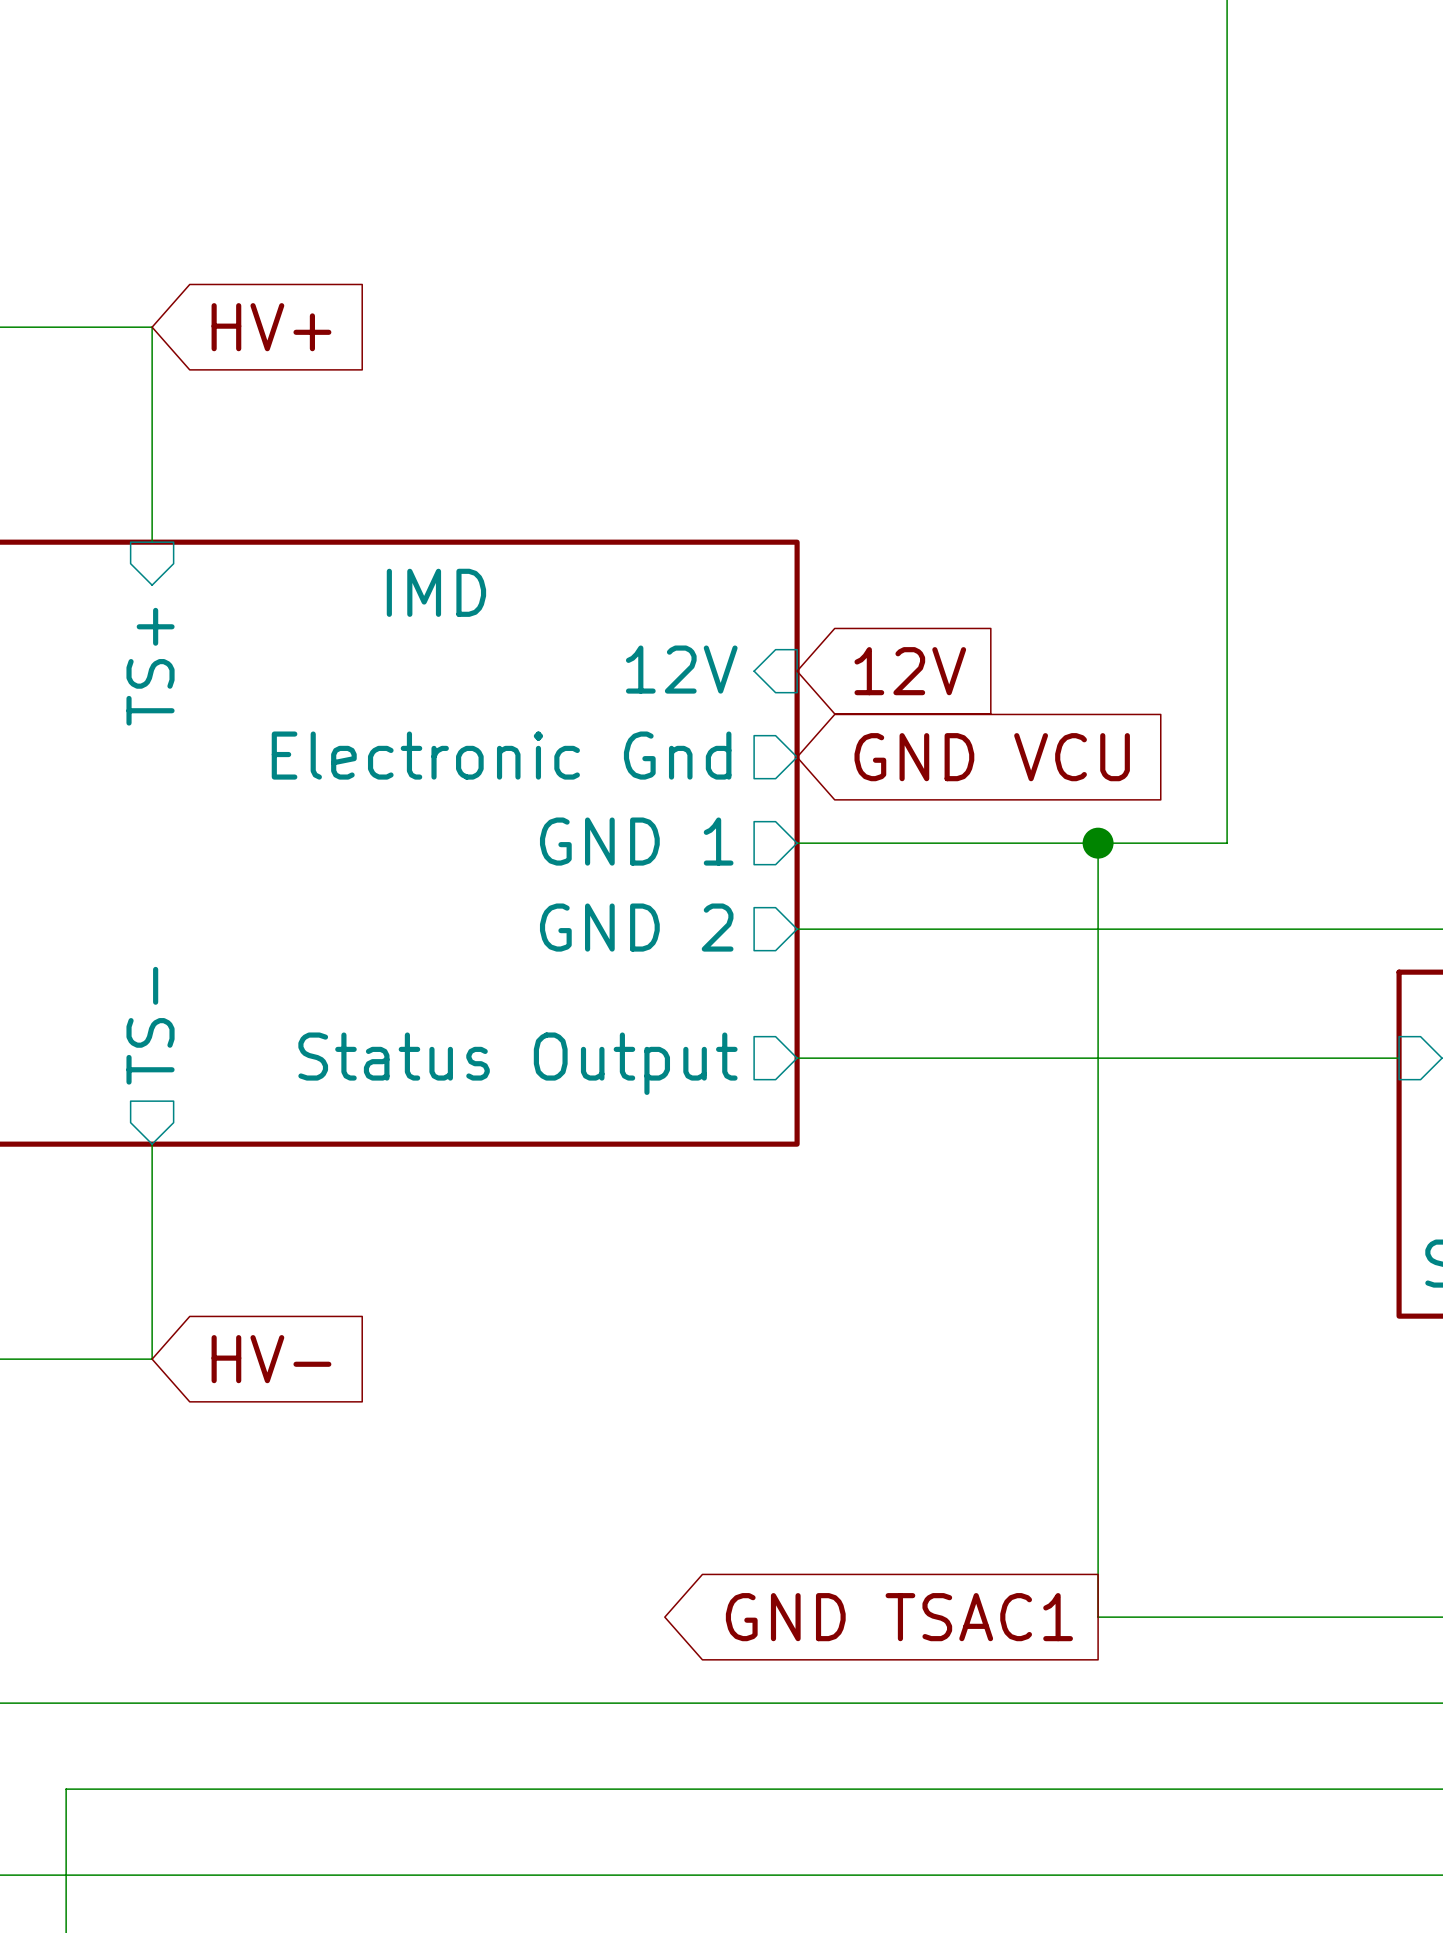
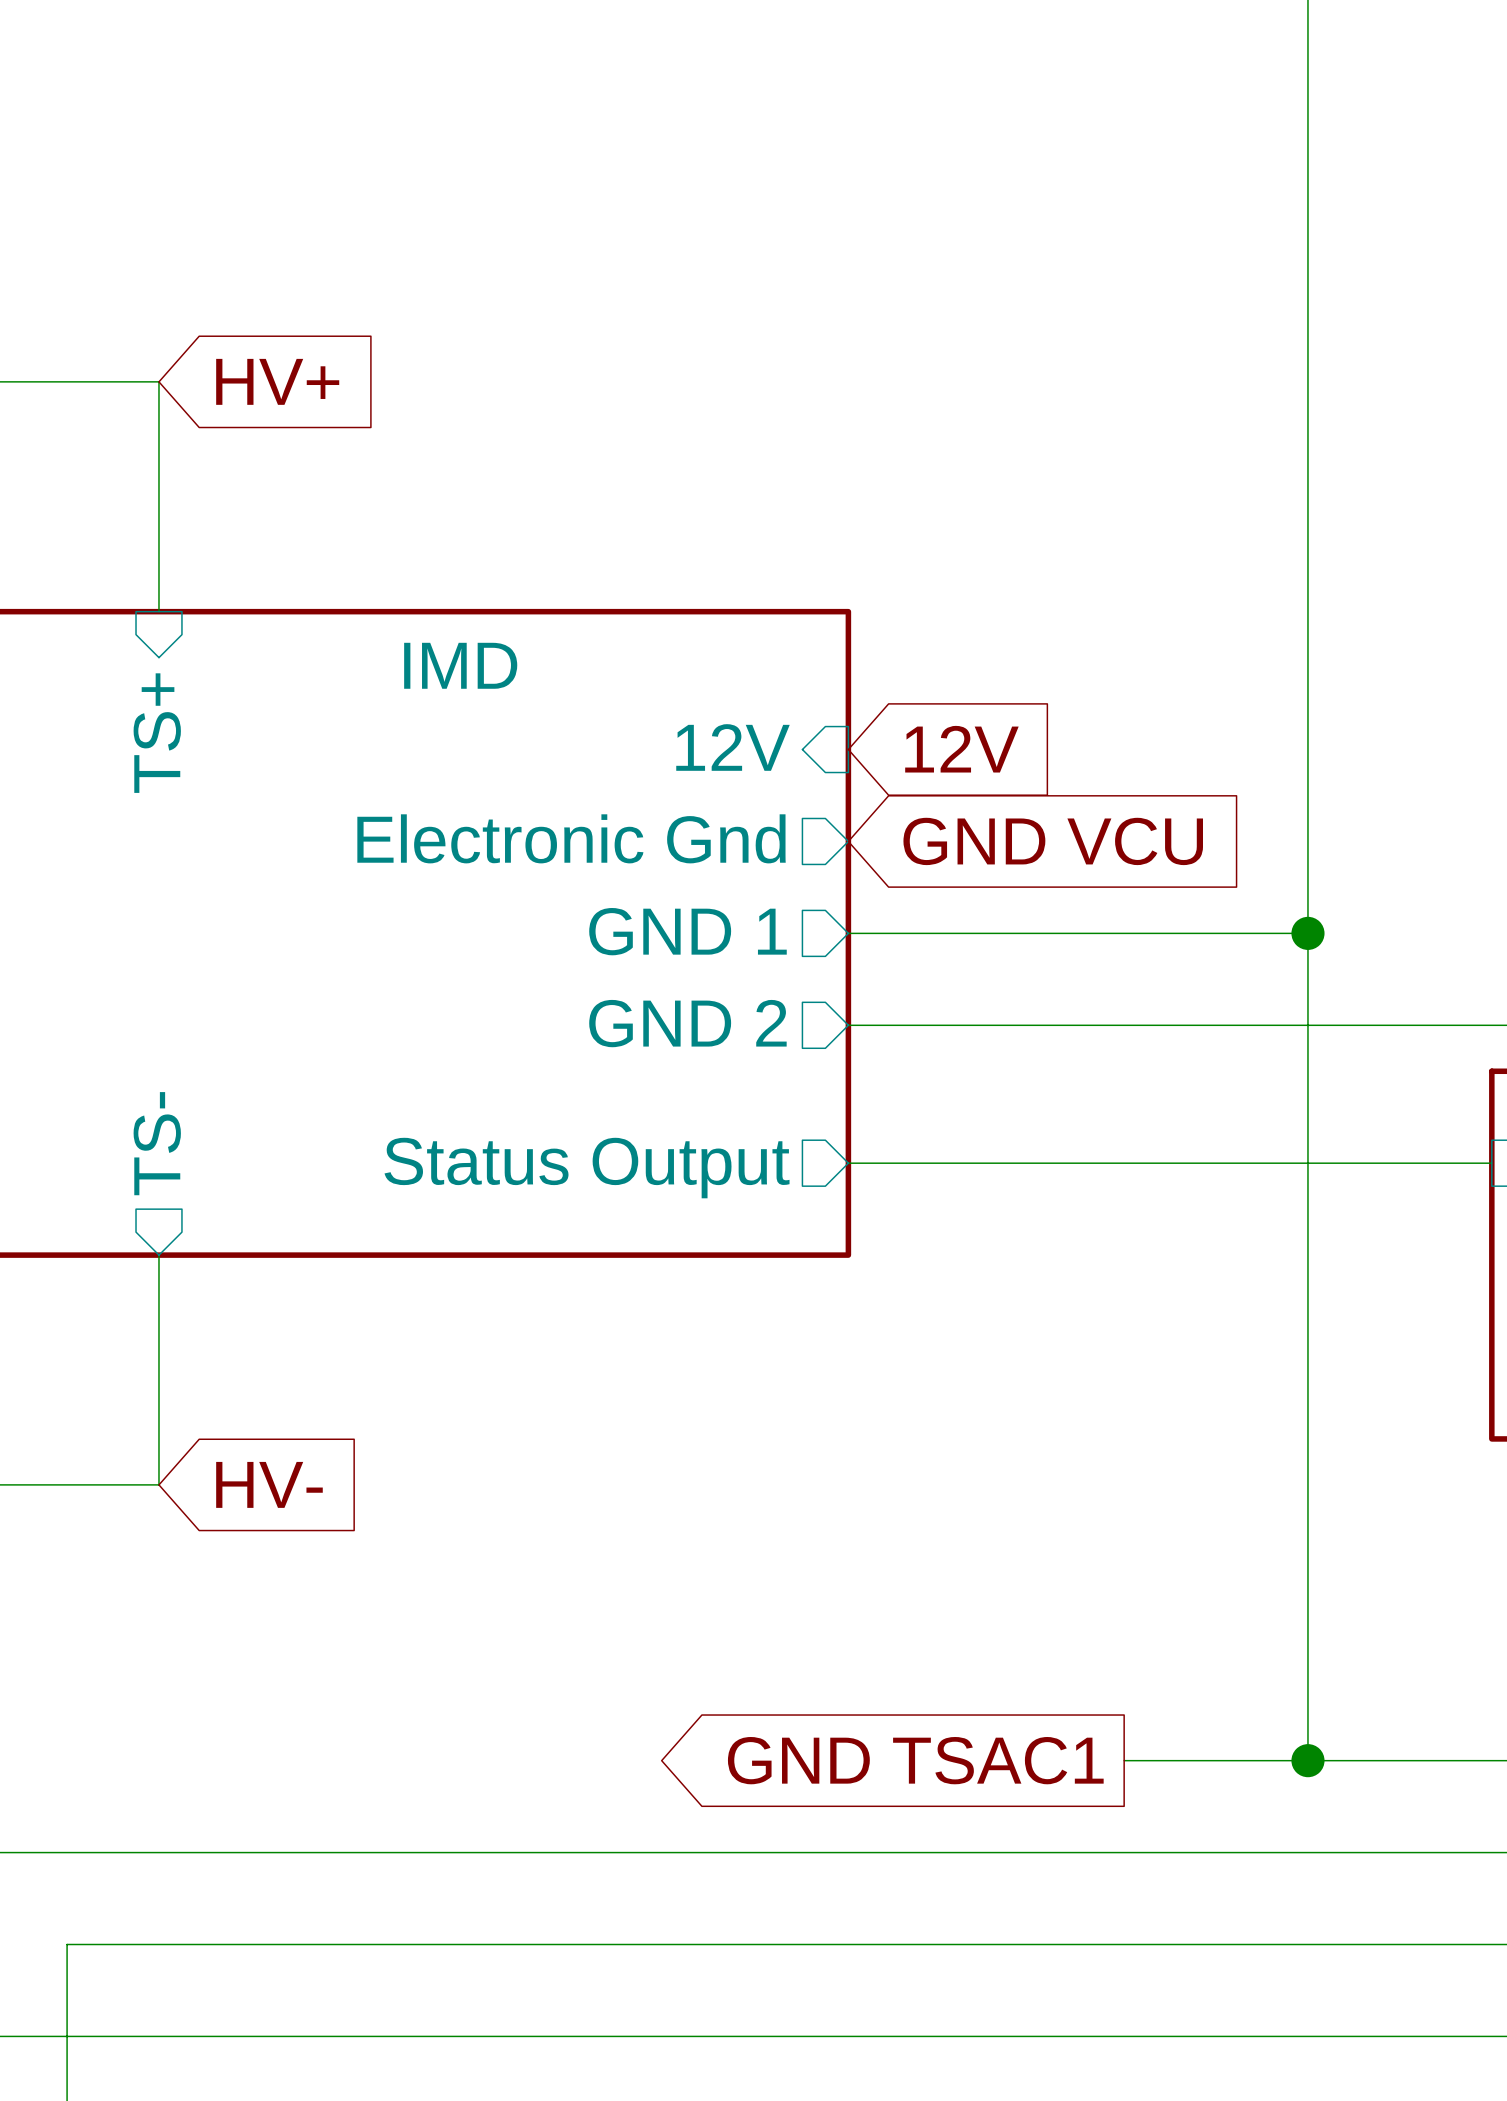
wire: (1098, 843) (1098, 1617) -> (1124, 1760) (1170, 1760)
junction position: (1098, 843) -> (1307, 933)
wire: none -> (1307, 933) (1307, 1760)
global label position: GND TSAC1 (899, 1617) -> GND TSAC1 (915, 1760)
junction: none -> (1307, 1760)

